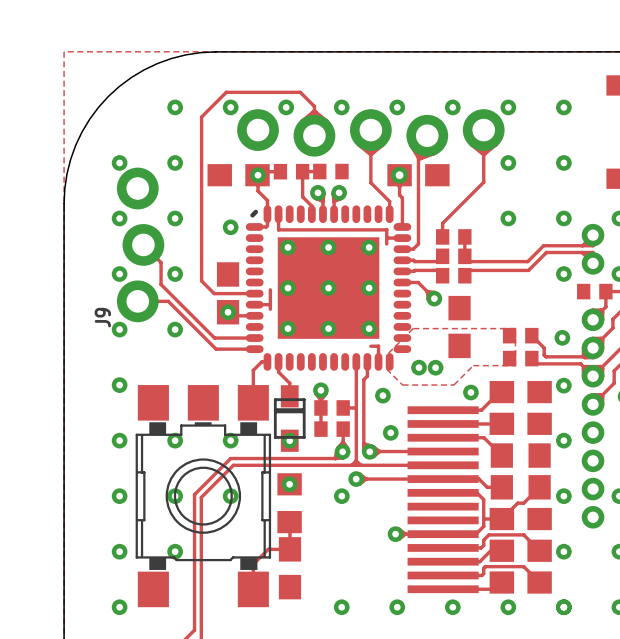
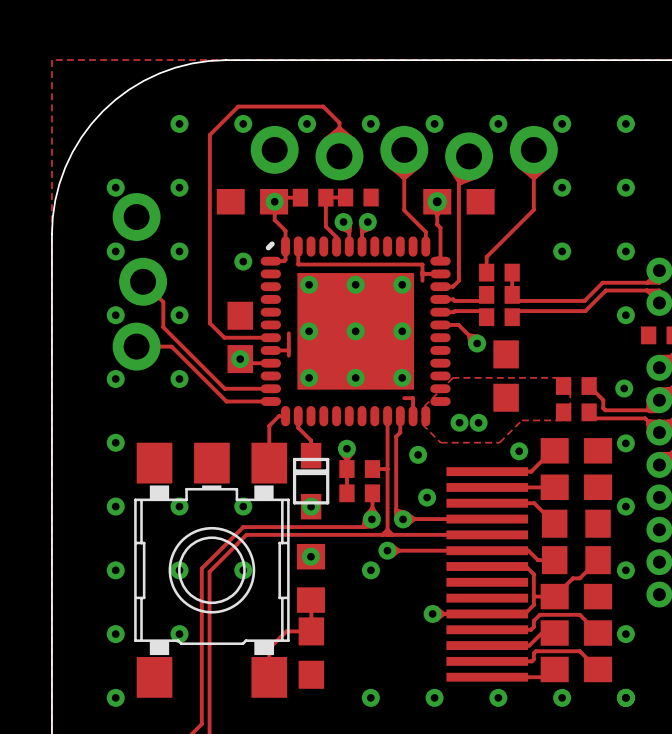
J9 name: J9 (102, 317) -> none

